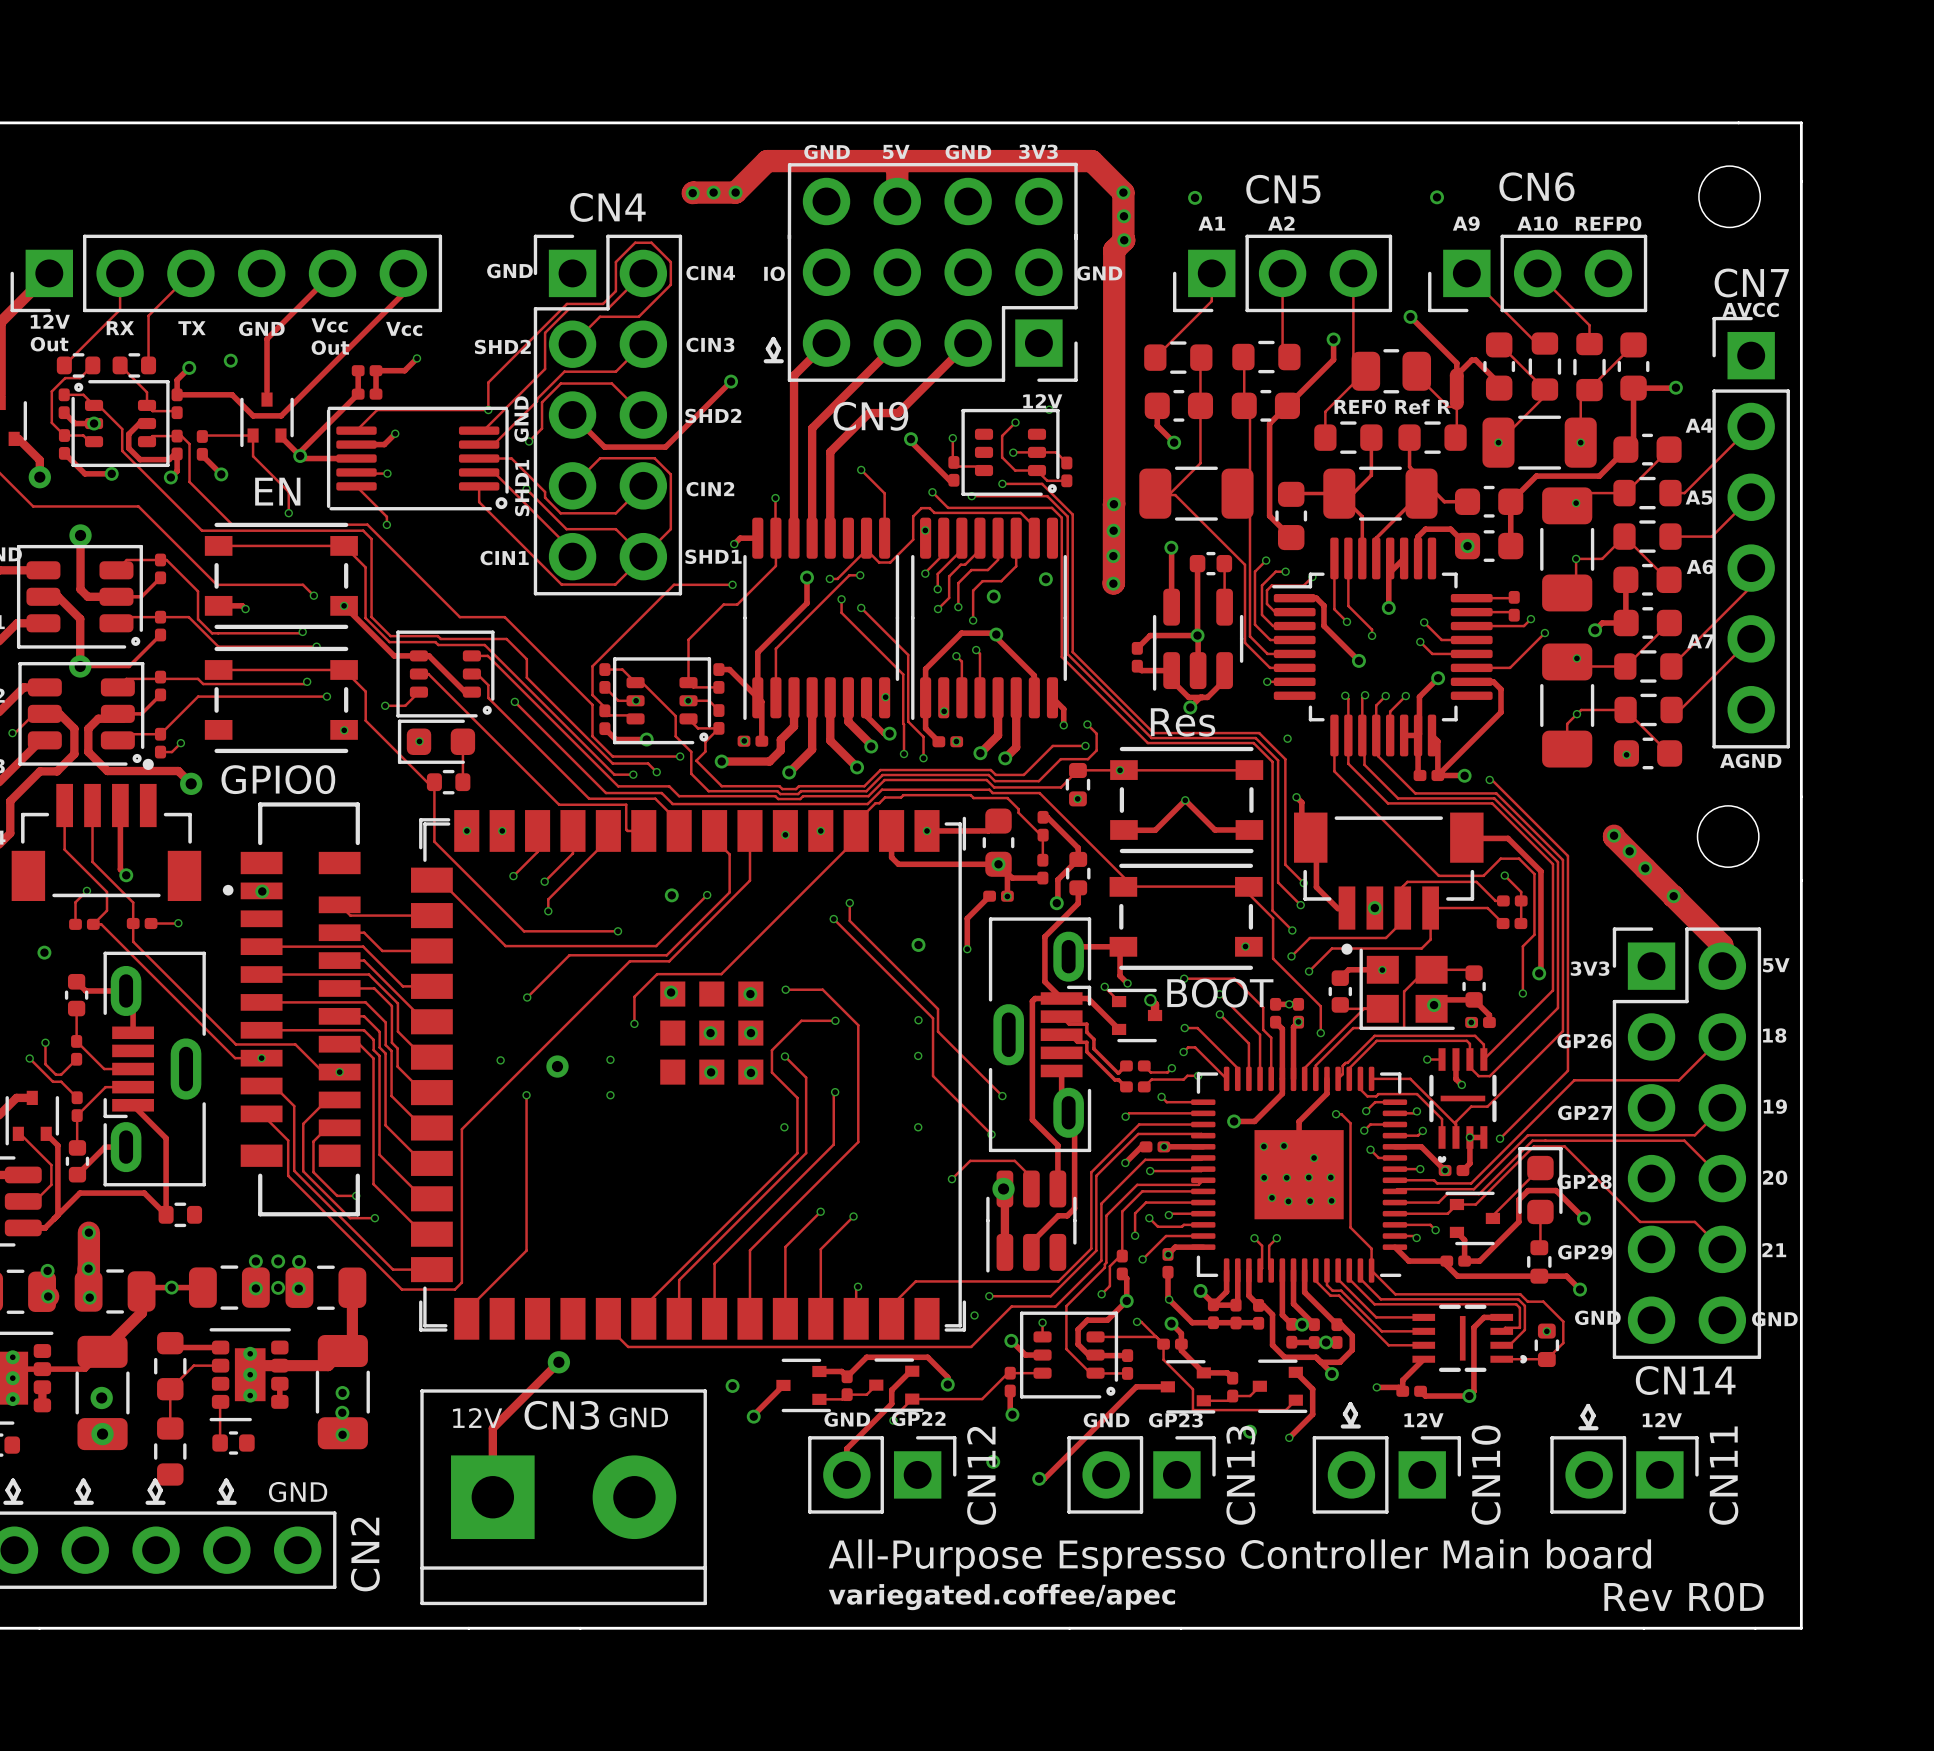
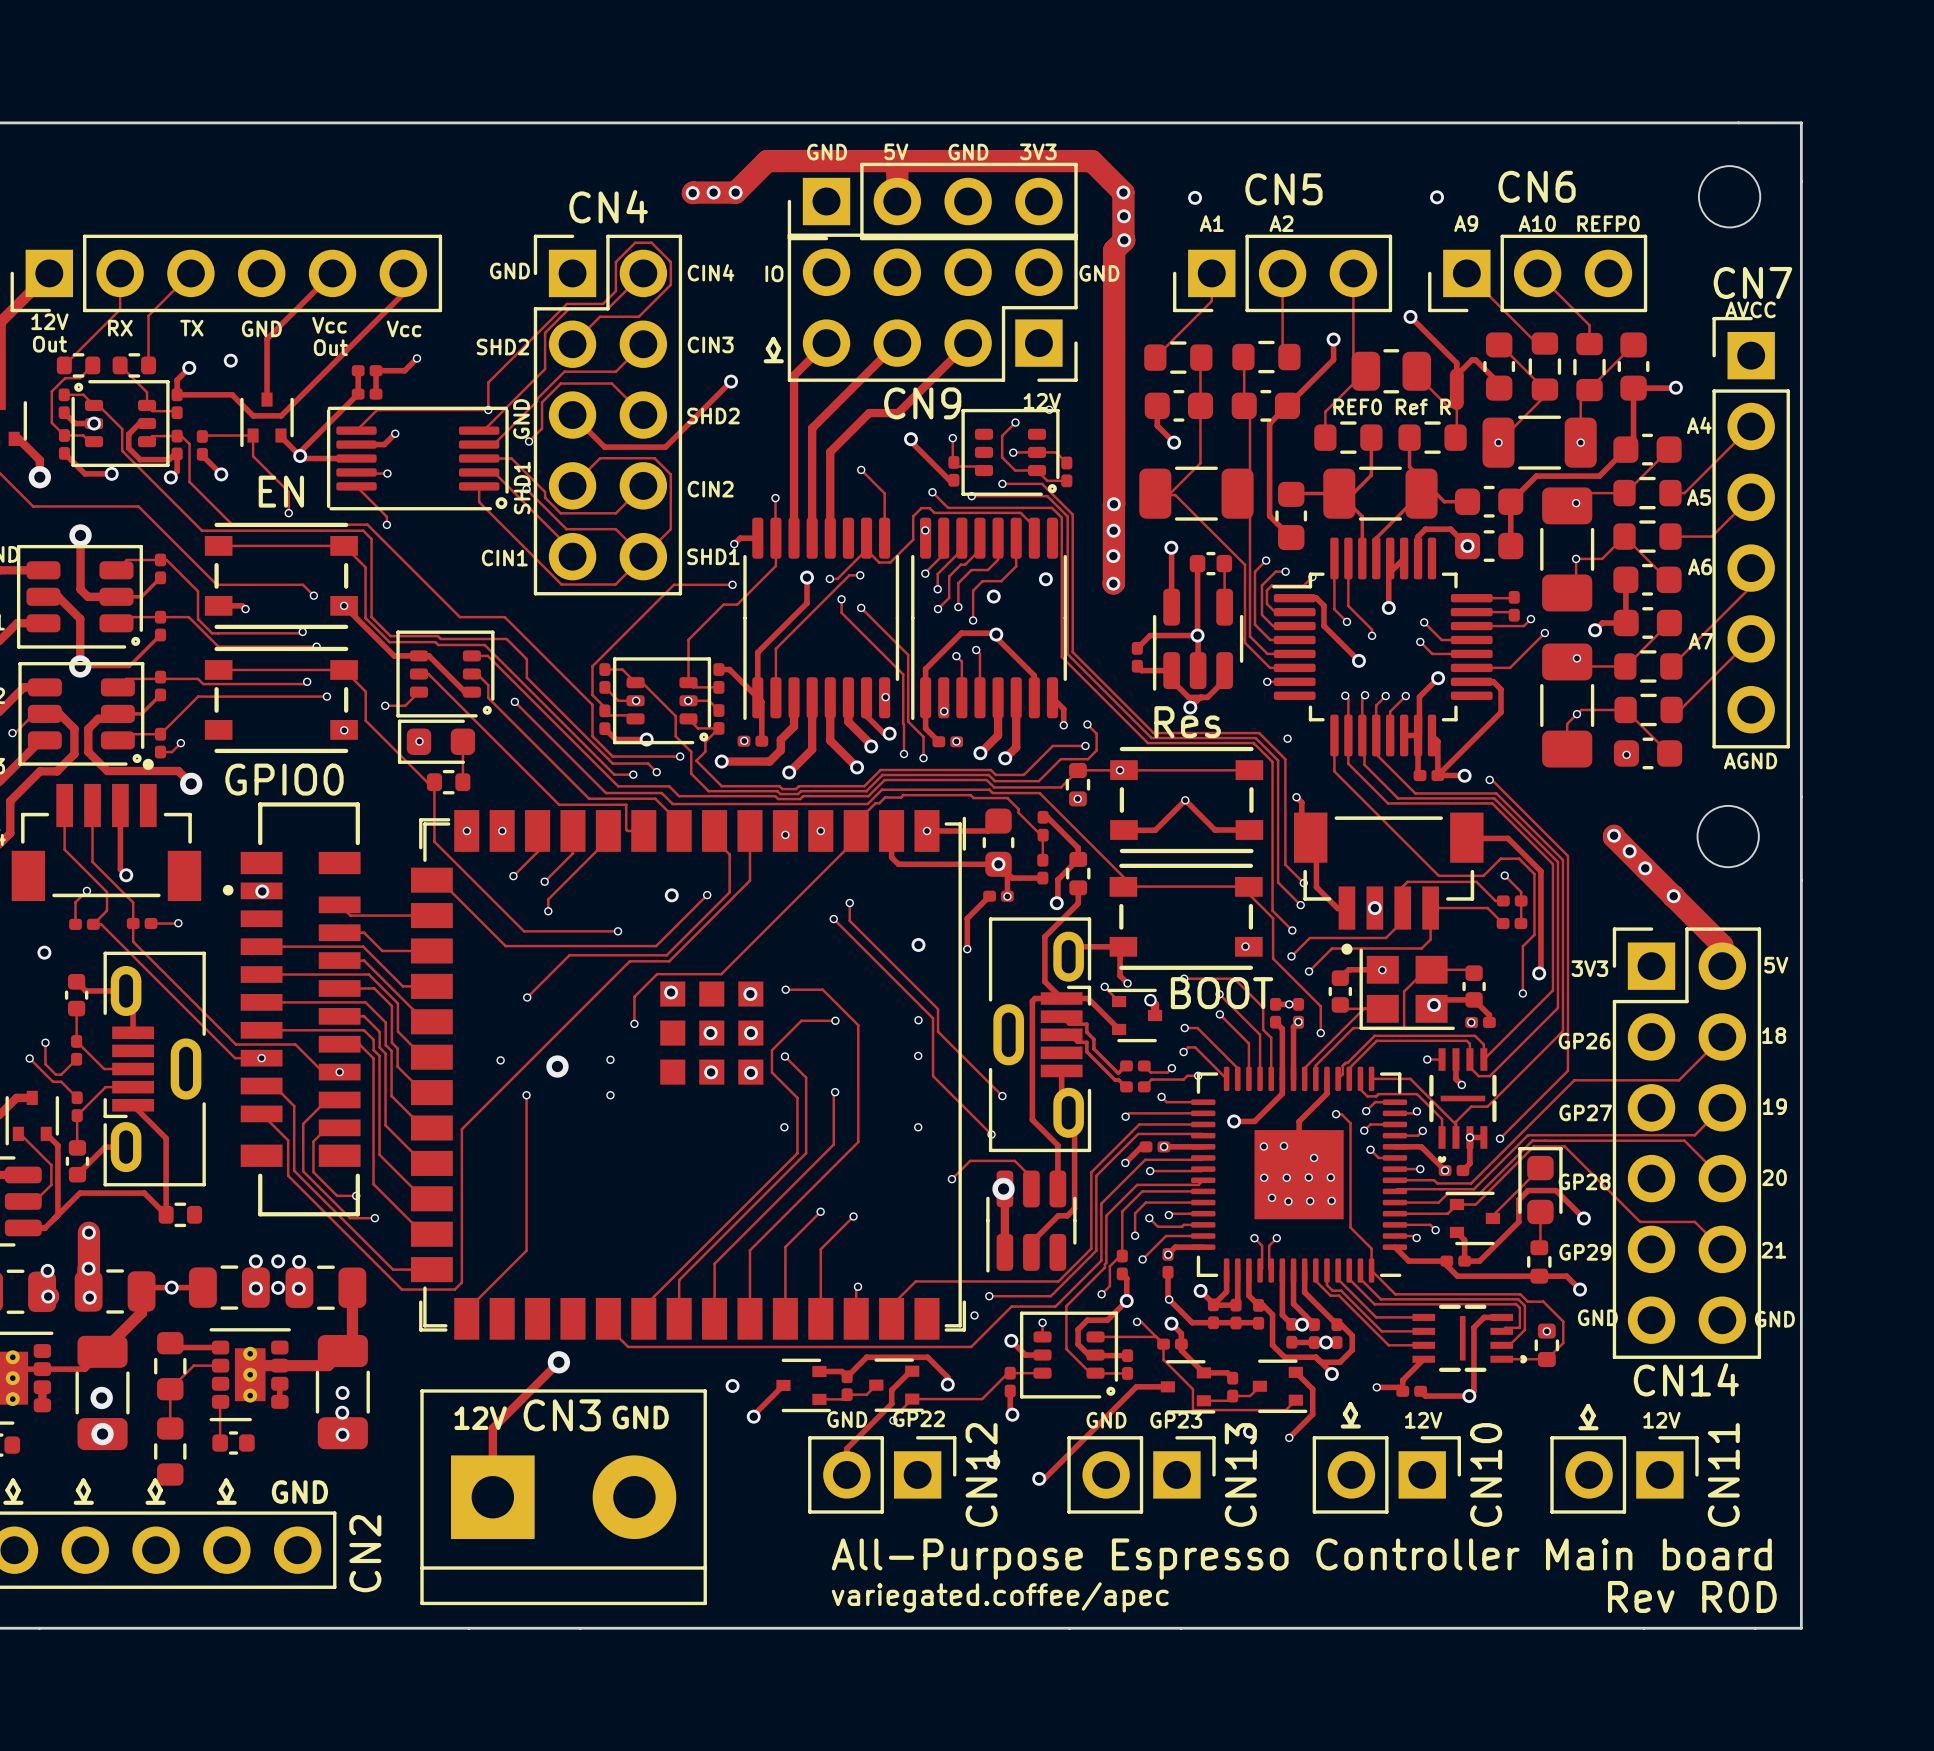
CN9 footprint: [787, 162, 1078, 382] -> [787, 233, 1078, 382]
part: none -> (932, 201)
CN9 name position: CN9 (870, 416) -> CN9 (922, 403)

